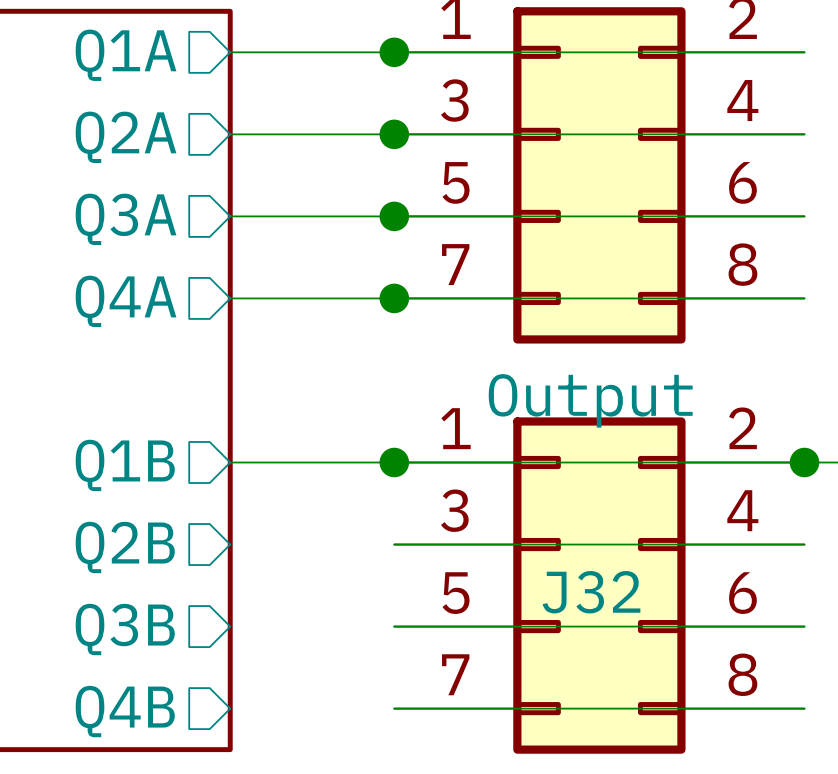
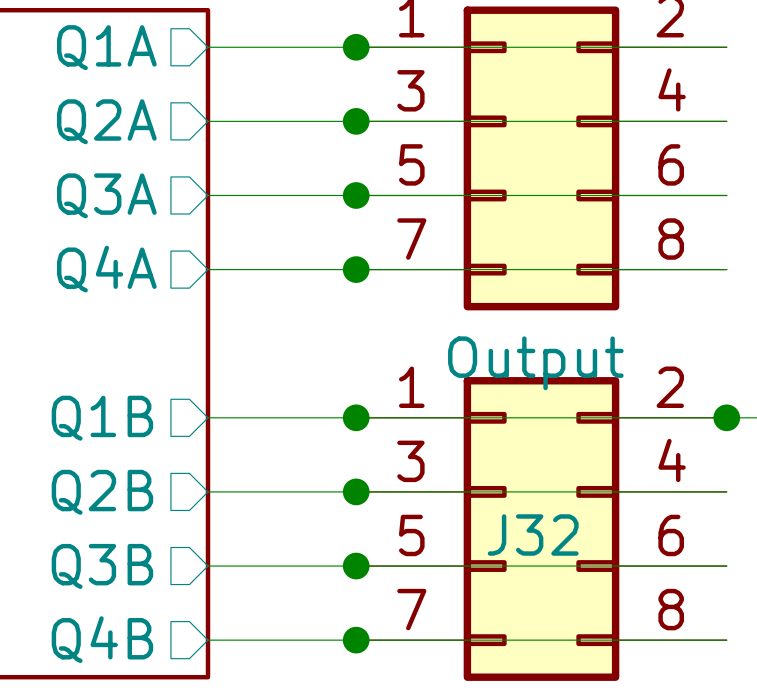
wire: none -> (208, 491) (356, 491)
junction: none -> (356, 491)
wire: none -> (208, 566) (356, 566)
junction: none -> (356, 566)
wire: none -> (208, 640) (356, 640)
junction: none -> (356, 640)

